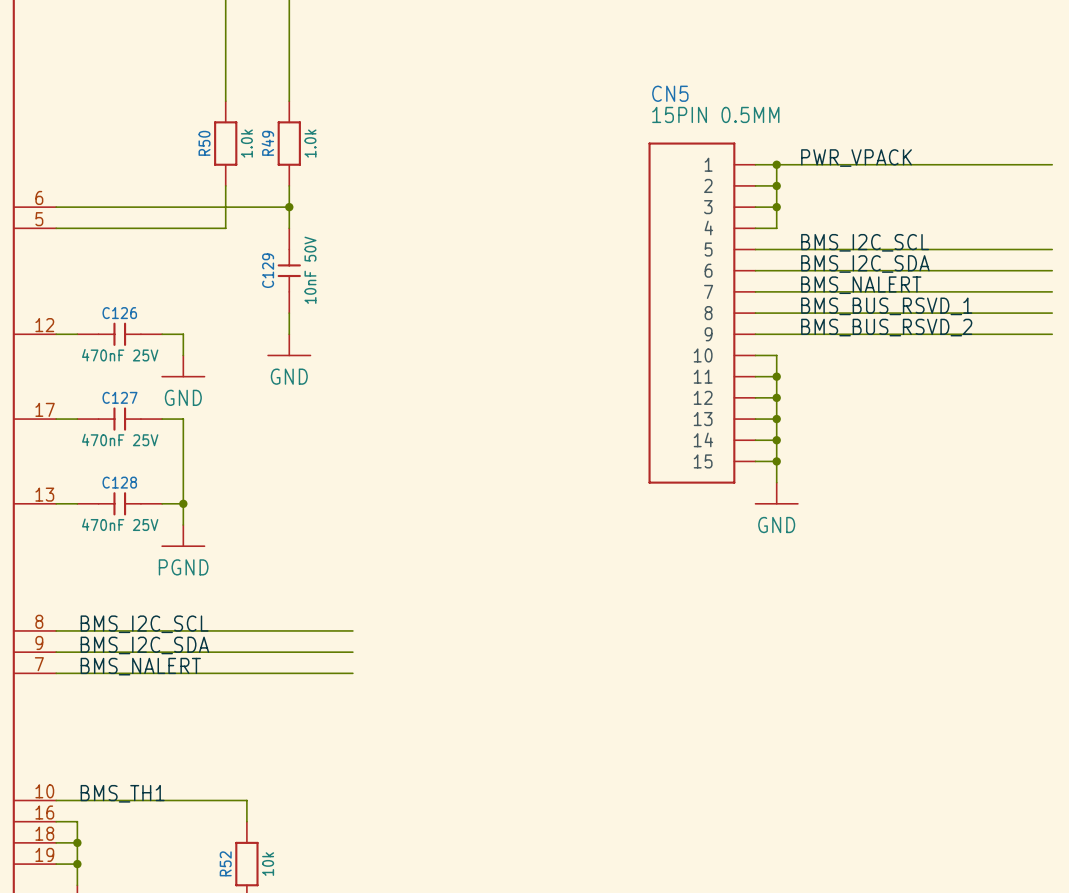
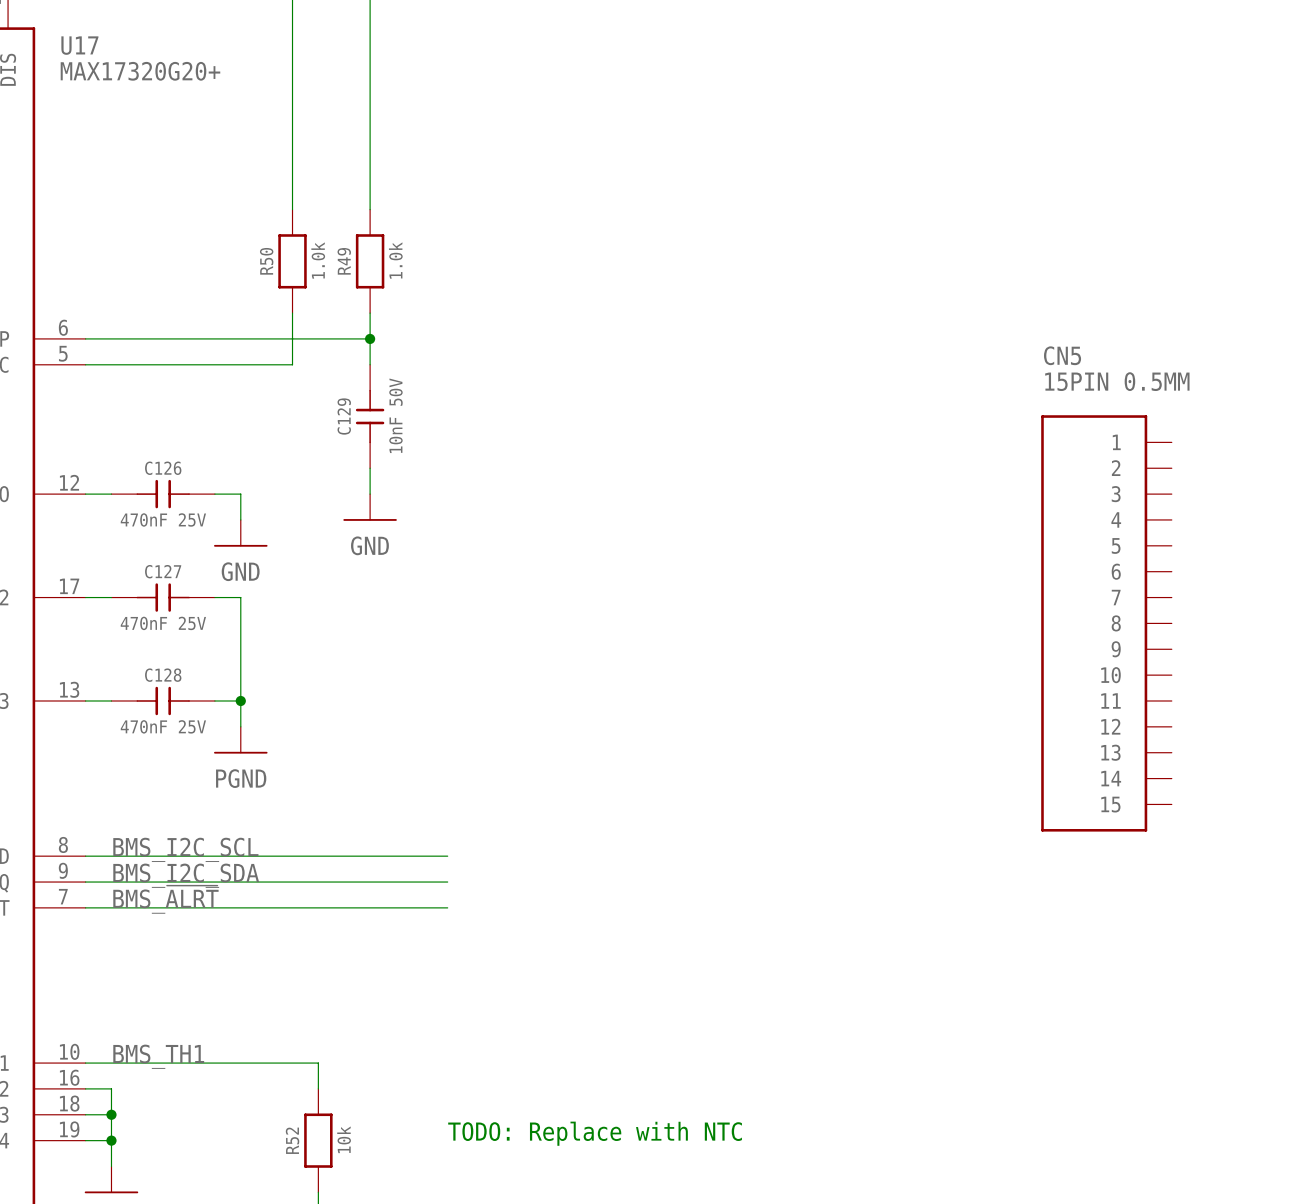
label: PWR_VPACK (856, 158) -> none
wire: (755, 164) (1052, 164) -> none
wire: (776, 164) (776, 228) (755, 228) -> none
junction: (776, 164) -> none
wire: (755, 185) (776, 185) -> none
junction: (776, 185) -> none
wire: (755, 207) (776, 207) -> none
junction: (776, 207) -> none
label: BMS_I2C_SCL (865, 242) -> none
wire: (755, 249) (1052, 249) -> none
label: BMS_I2C_SDA (865, 263) -> none
wire: (755, 270) (1052, 270) -> none
label: BMS_NALERT (861, 285) -> none
wire: (755, 291) (1052, 291) -> none
label: BMS_BUS_RSVD_1 (886, 306) -> none
CN5 position: (702, 313) -> (1106, 623)
wire: (755, 313) (1052, 313) -> none
label: BMS_BUS_RSVD_2 (886, 327) -> none
wire: (755, 334) (1052, 334) -> none
wire: (755, 355) (776, 355) (776, 482) -> none
wire: (755, 376) (776, 376) -> none
junction: (776, 376) -> none
wire: (755, 397) (776, 397) -> none
junction: (776, 397) -> none
wire: (755, 419) (776, 419) -> none
junction: (776, 419) -> none
wire: (755, 440) (776, 440) -> none
junction: (776, 440) -> none
wire: (755, 461) (776, 461) -> none
junction: (776, 461) -> none
power symbol: GND (776, 493) -> none
label: BMS_NALERT (140, 666) -> BMS_~{ALRT} (165, 899)
text: none -> TODO: Replace with NTC (595, 1133)

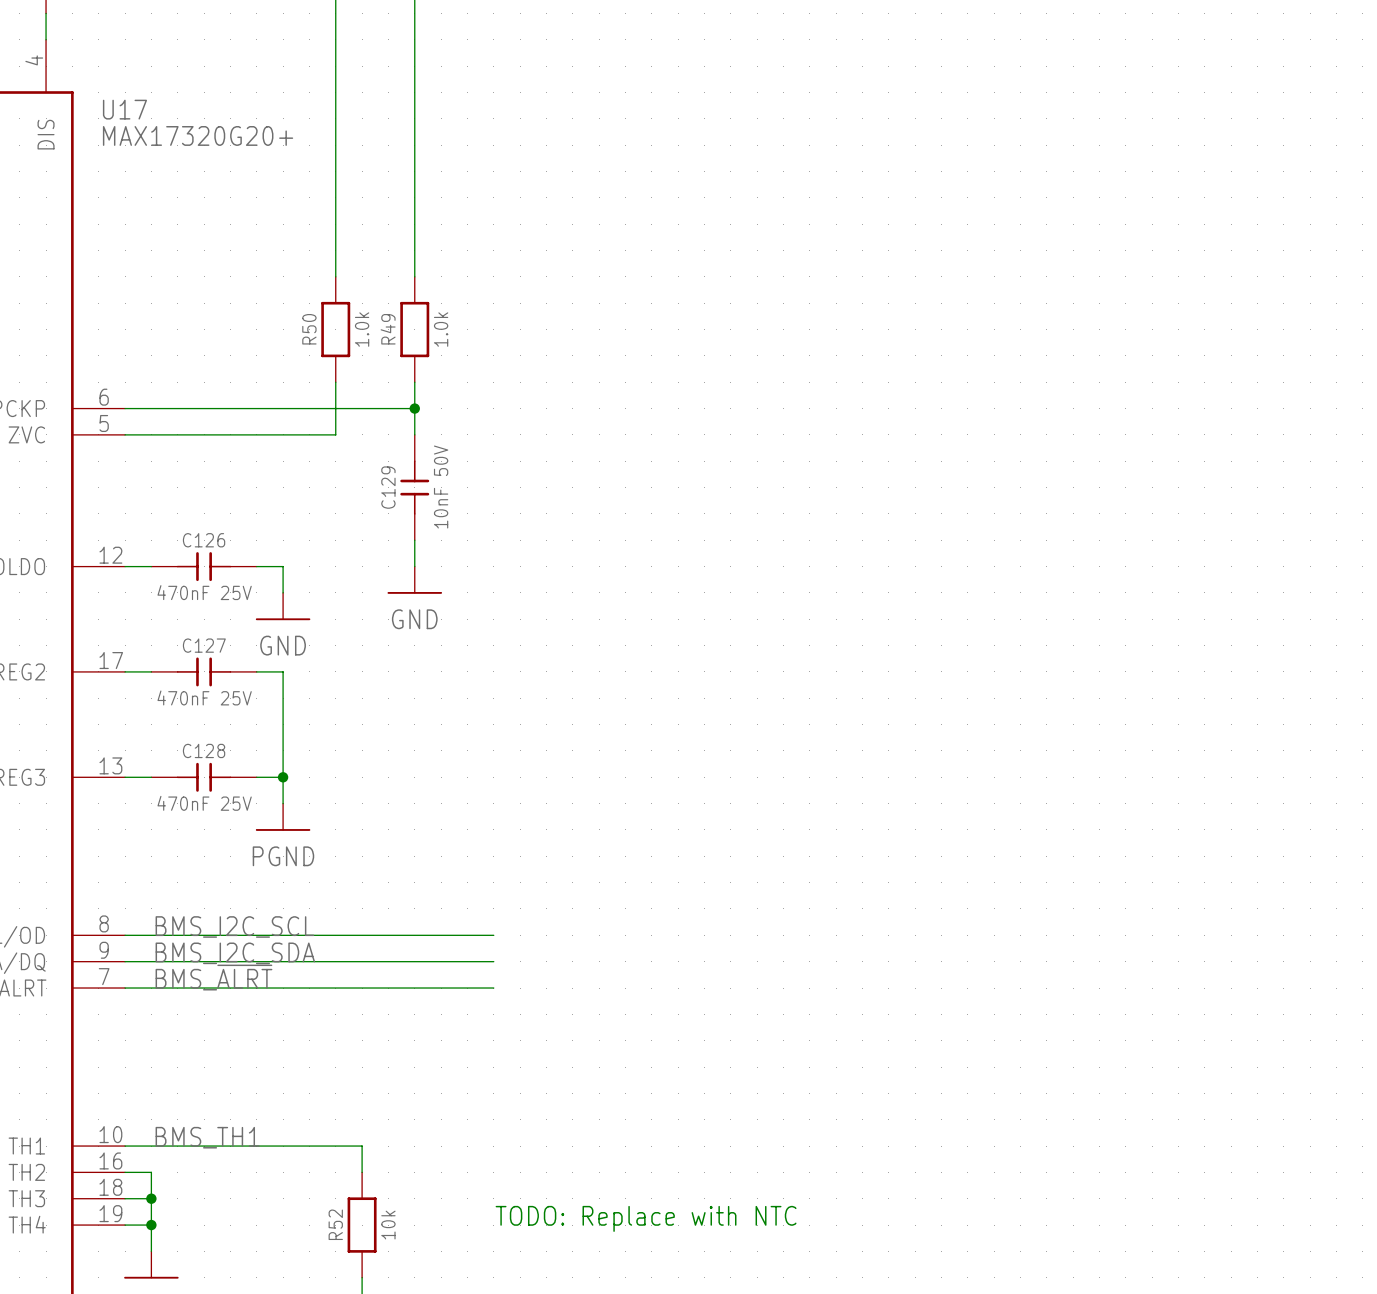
CN5: 15PIN 0.5MM (1106, 623) -> none

